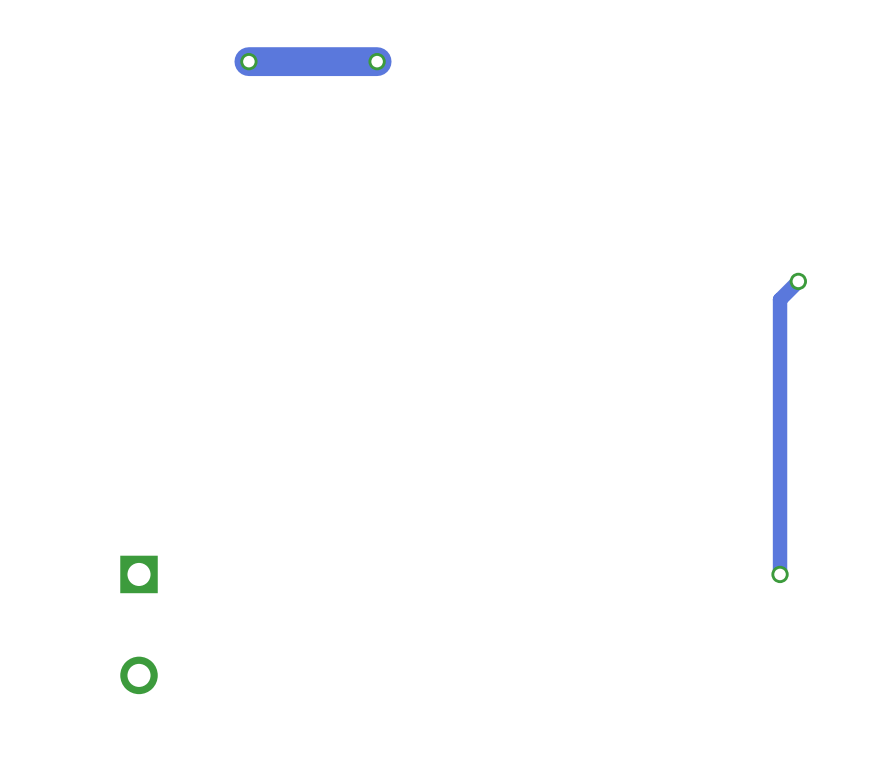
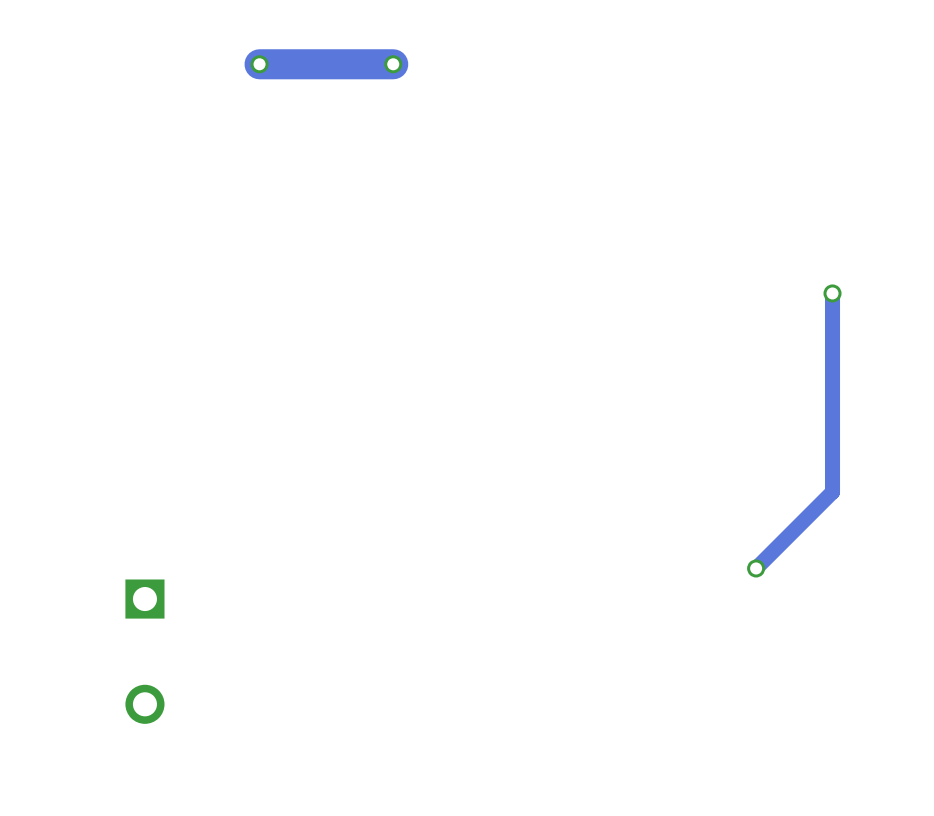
track: (798, 281) (780, 299) (780, 574) -> (832, 293) (832, 492) (756, 568)
via position: (780, 574) -> (756, 568)

